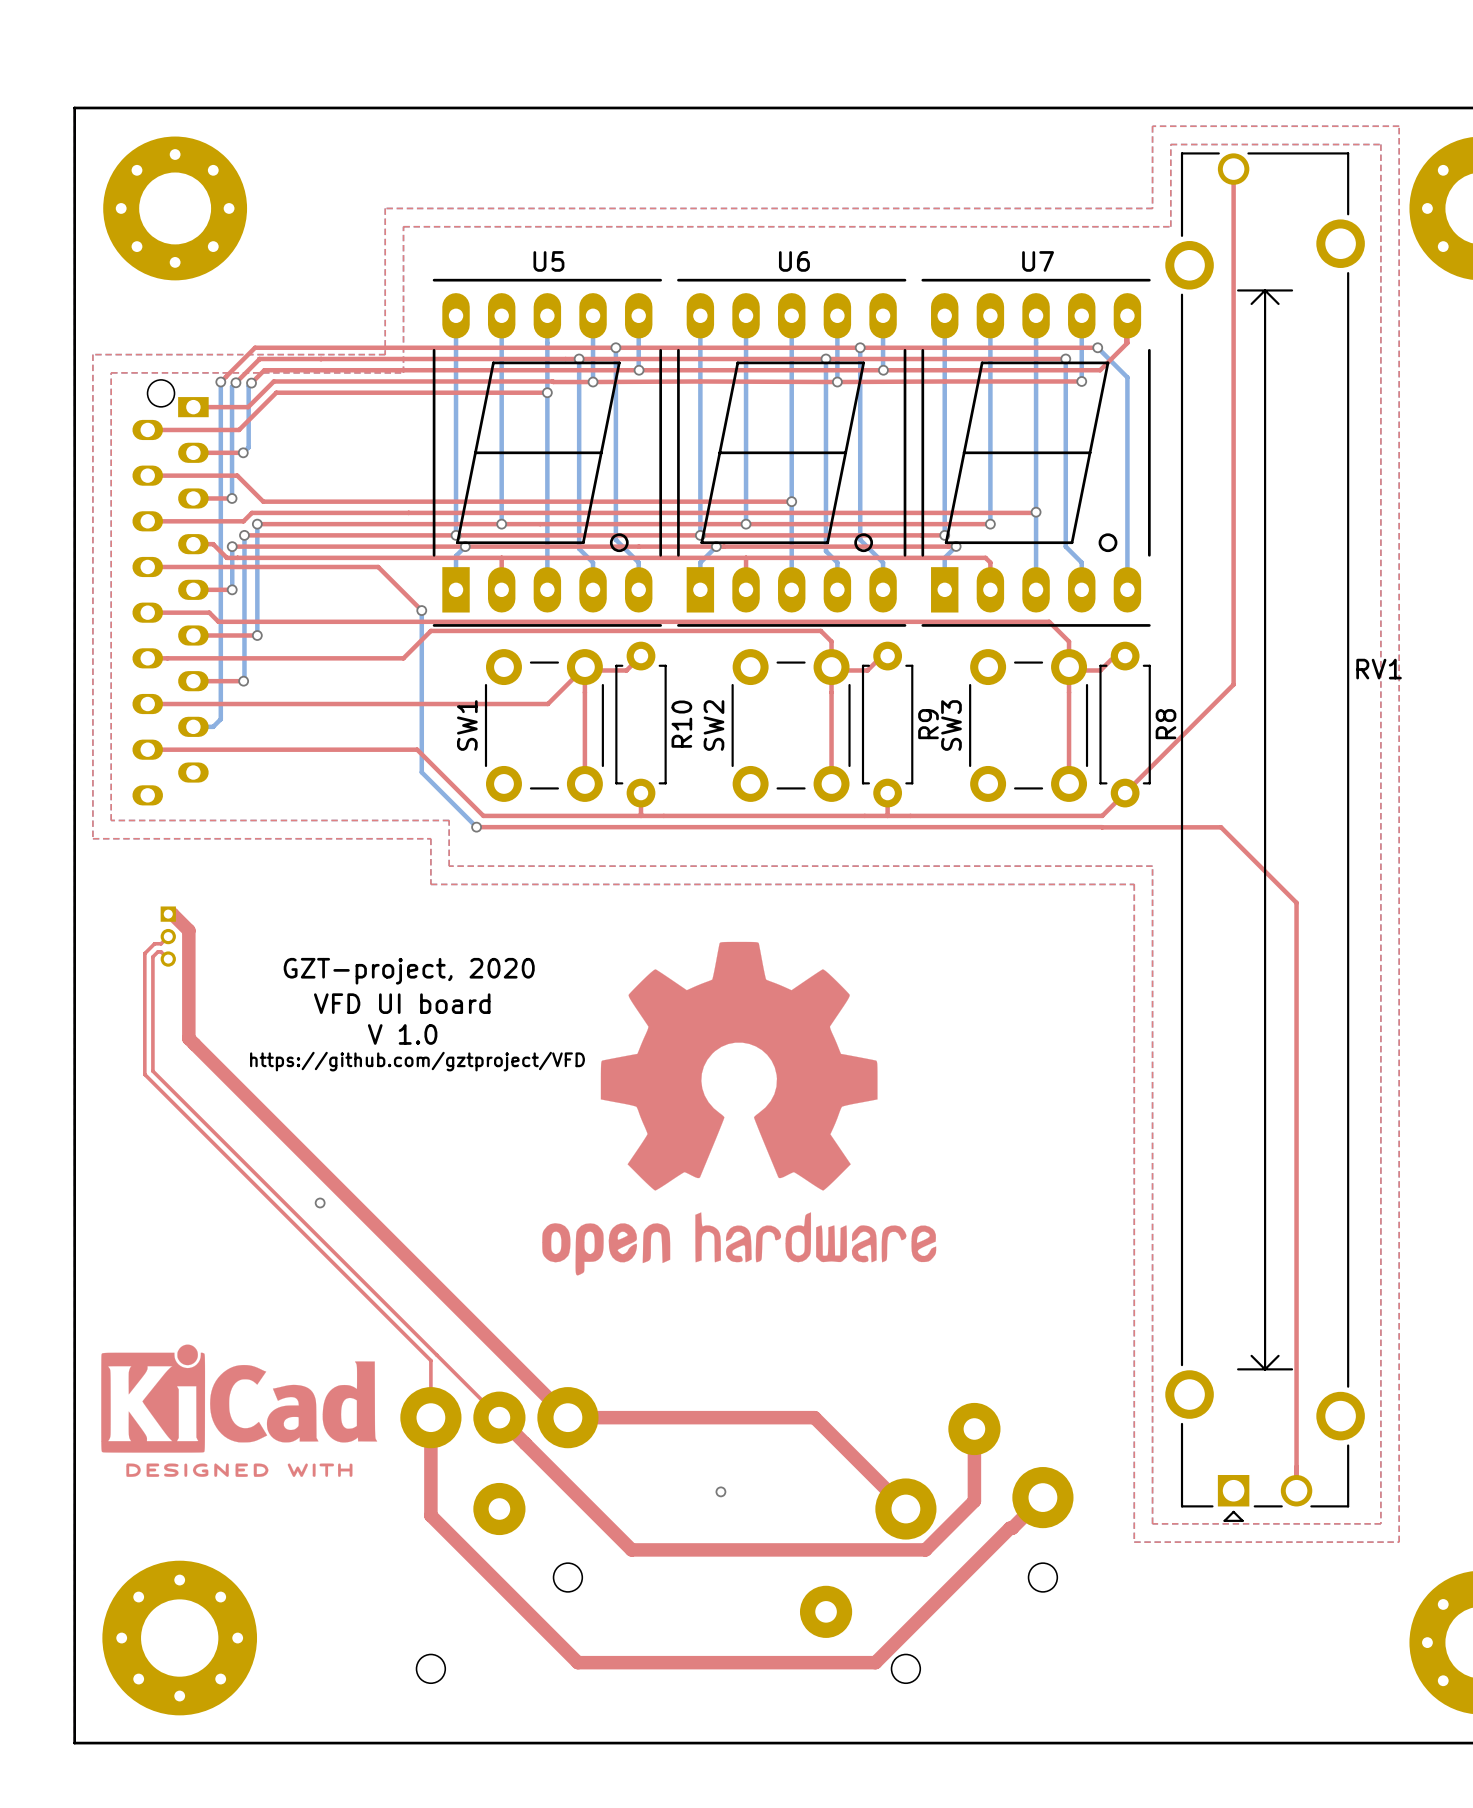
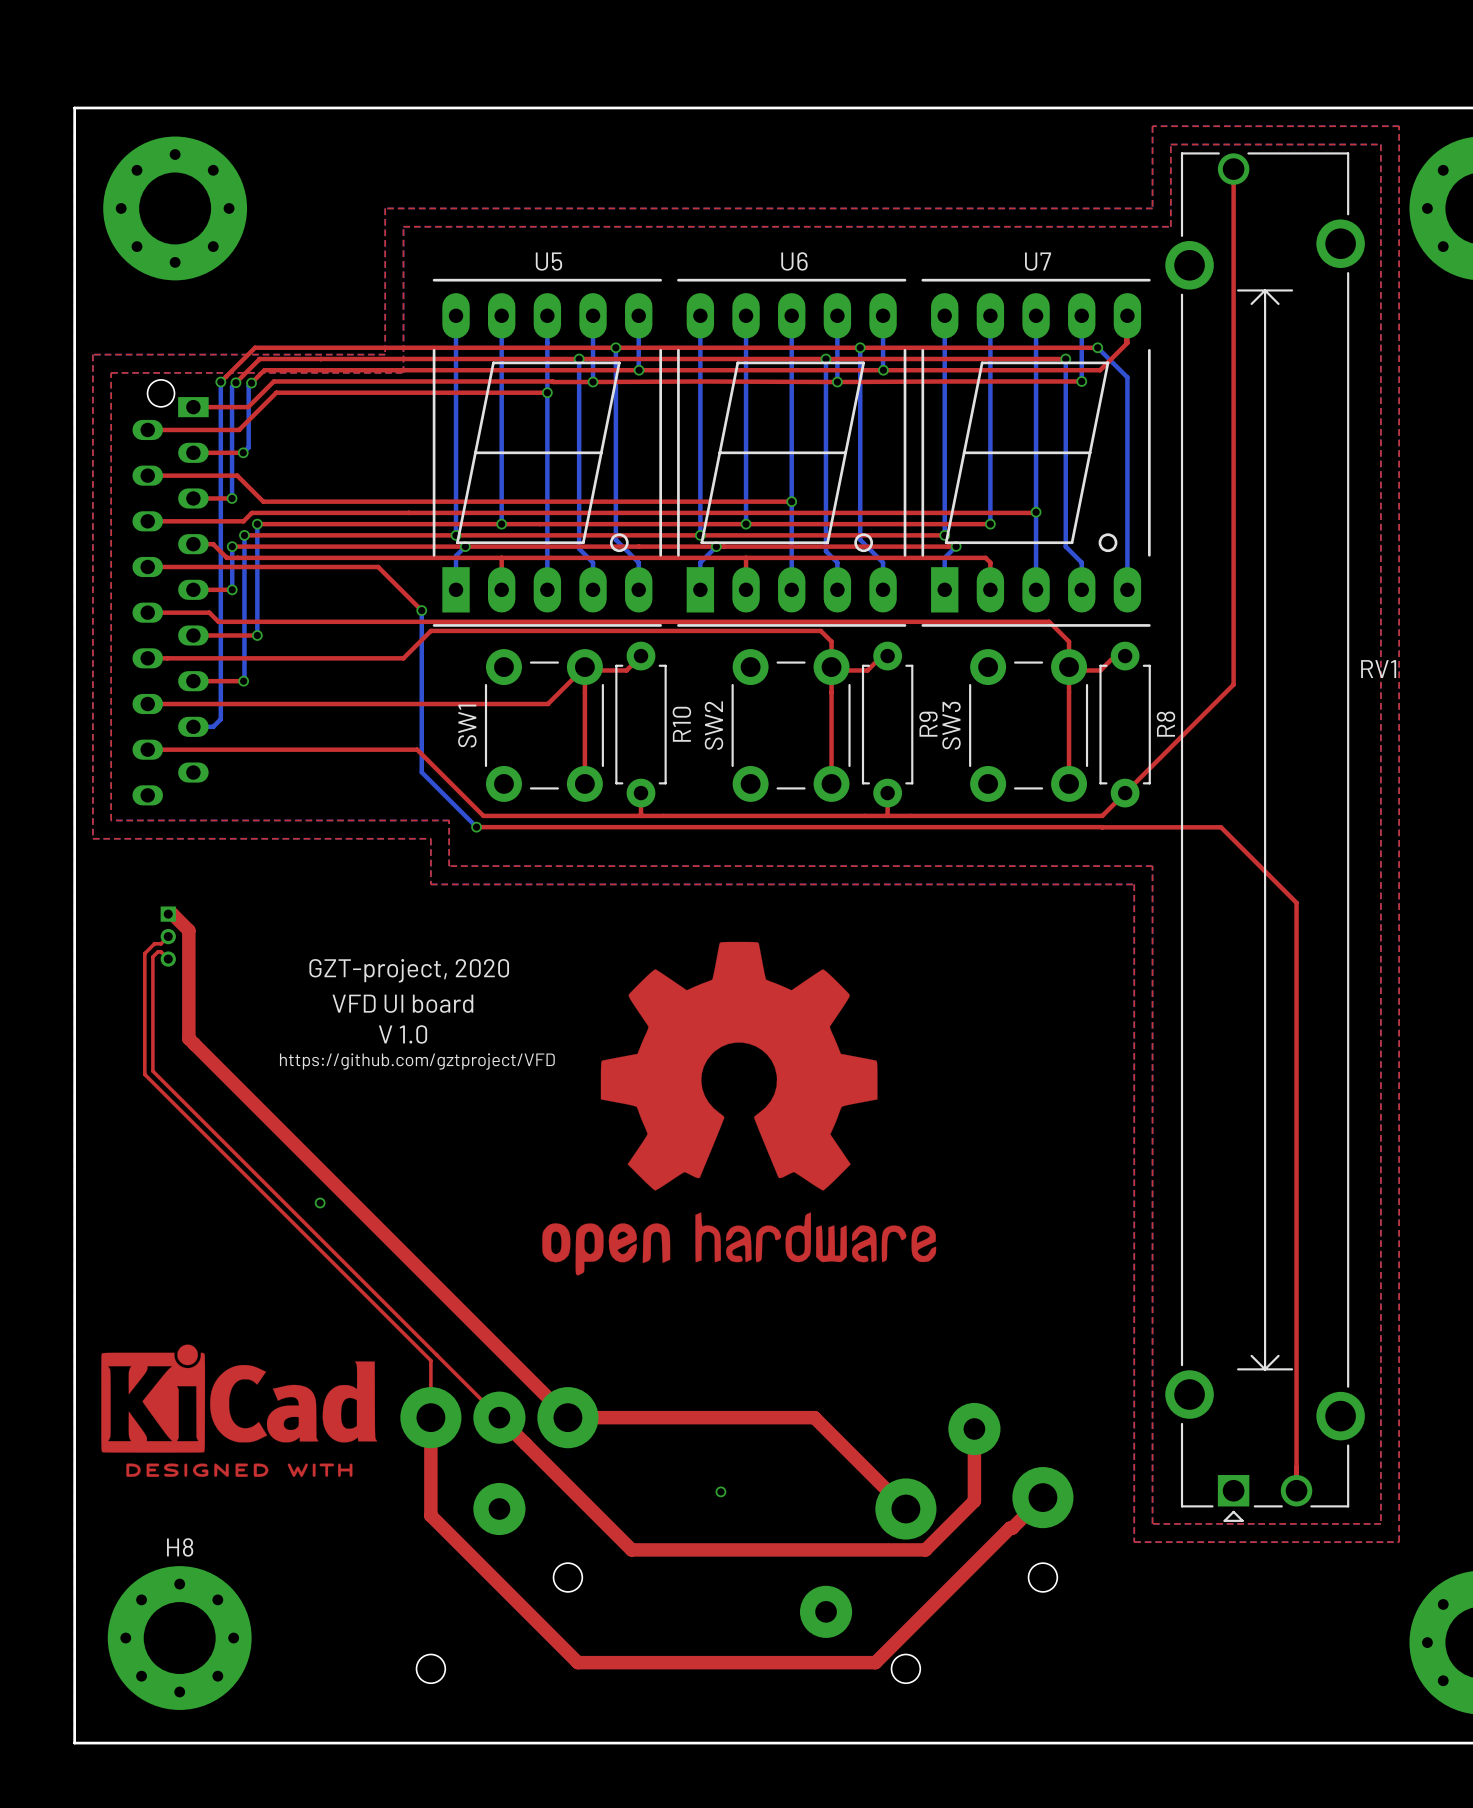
part: (179, 1638) -> none
H8: none -> (179, 1638)

